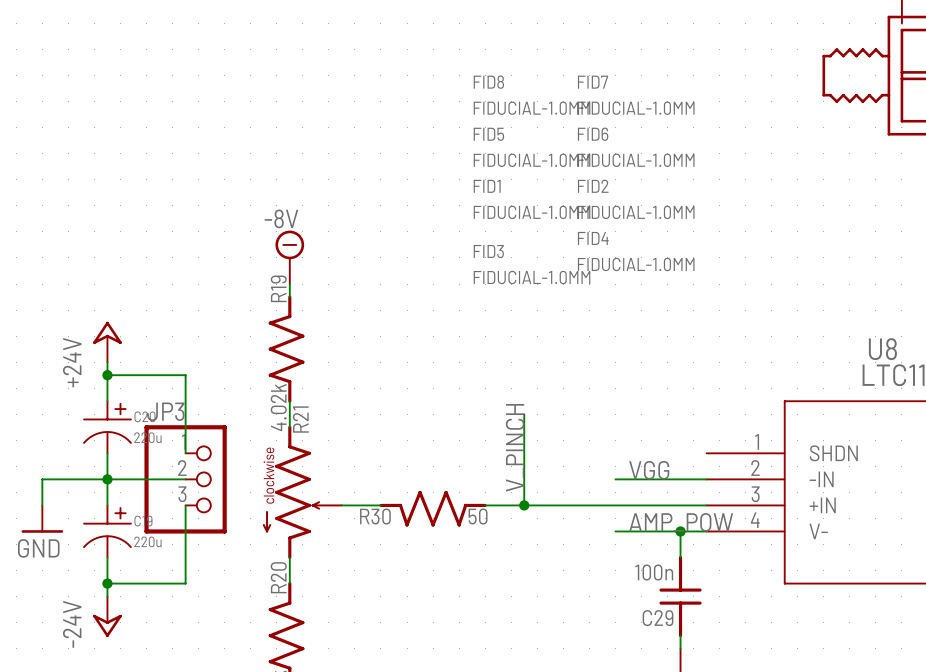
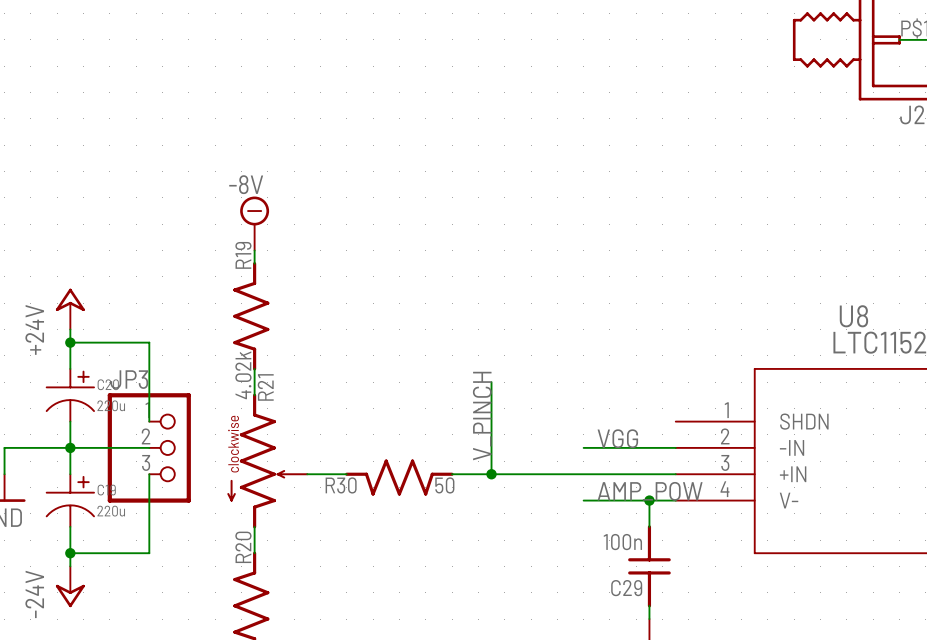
FID8: FIDUCIAL-1.0MM (532, 95) -> none
FID7: FIDUCIAL-1.0MM (636, 95) -> none
FID5: FIDUCIAL-1.0MM (532, 147) -> none
FID6: FIDUCIAL-1.0MM (636, 147) -> none
FID1: FIDUCIAL-1.0MM (532, 199) -> none
FID2: FIDUCIAL-1.0MM (636, 199) -> none
FID4: FIDUCIAL-1.0MM (636, 251) -> none
FID3: FIDUCIAL-1.0MM (532, 264) -> none

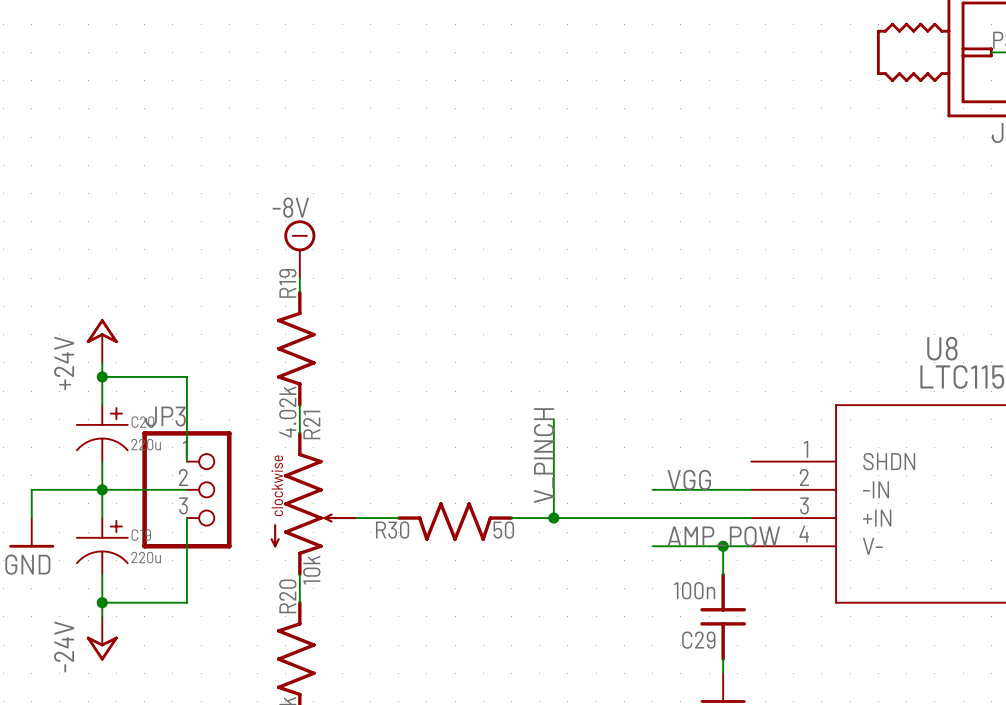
R21 value: none -> 10k (311, 570)

